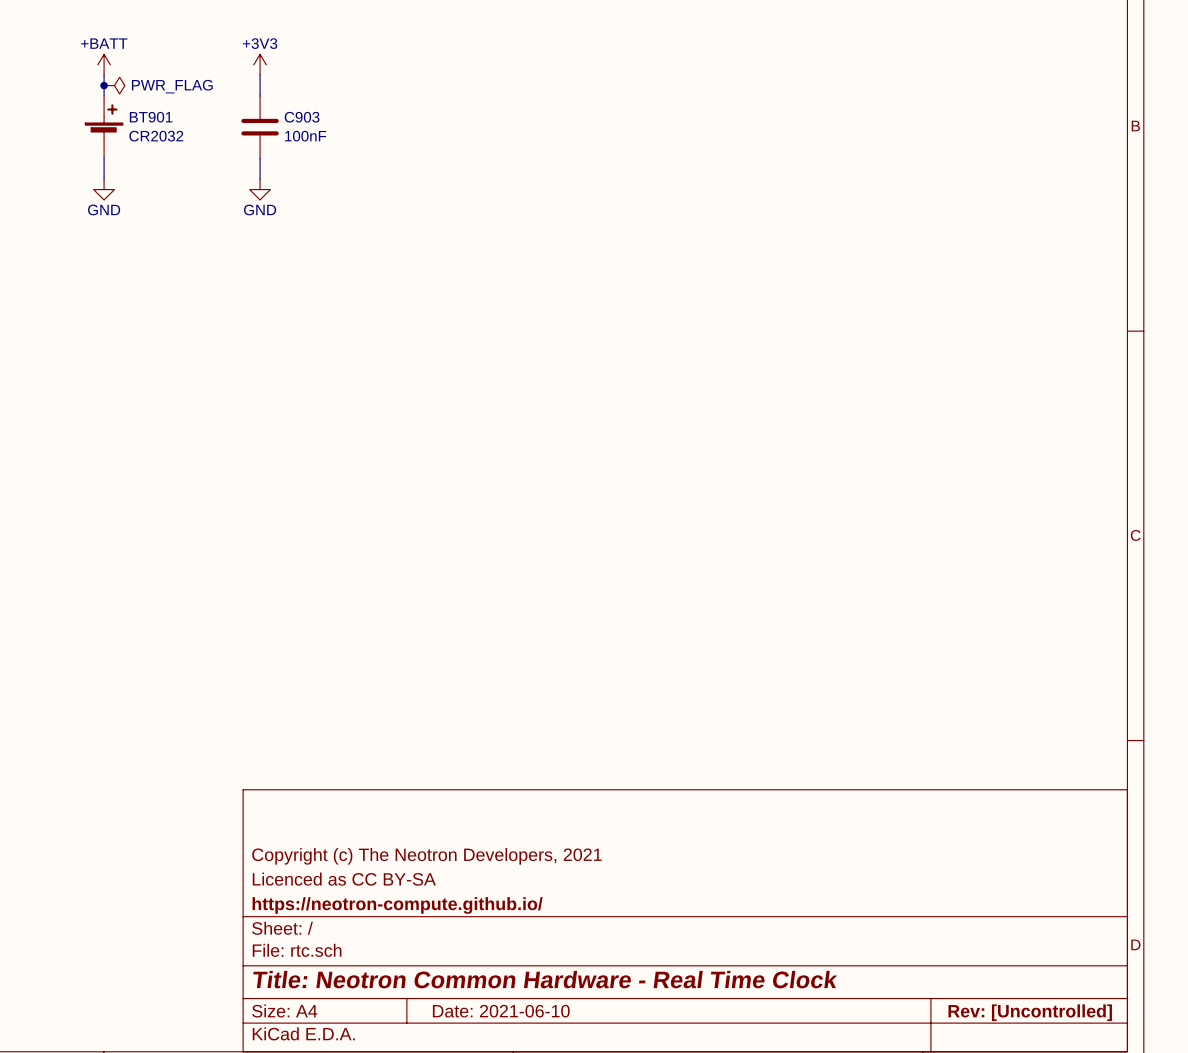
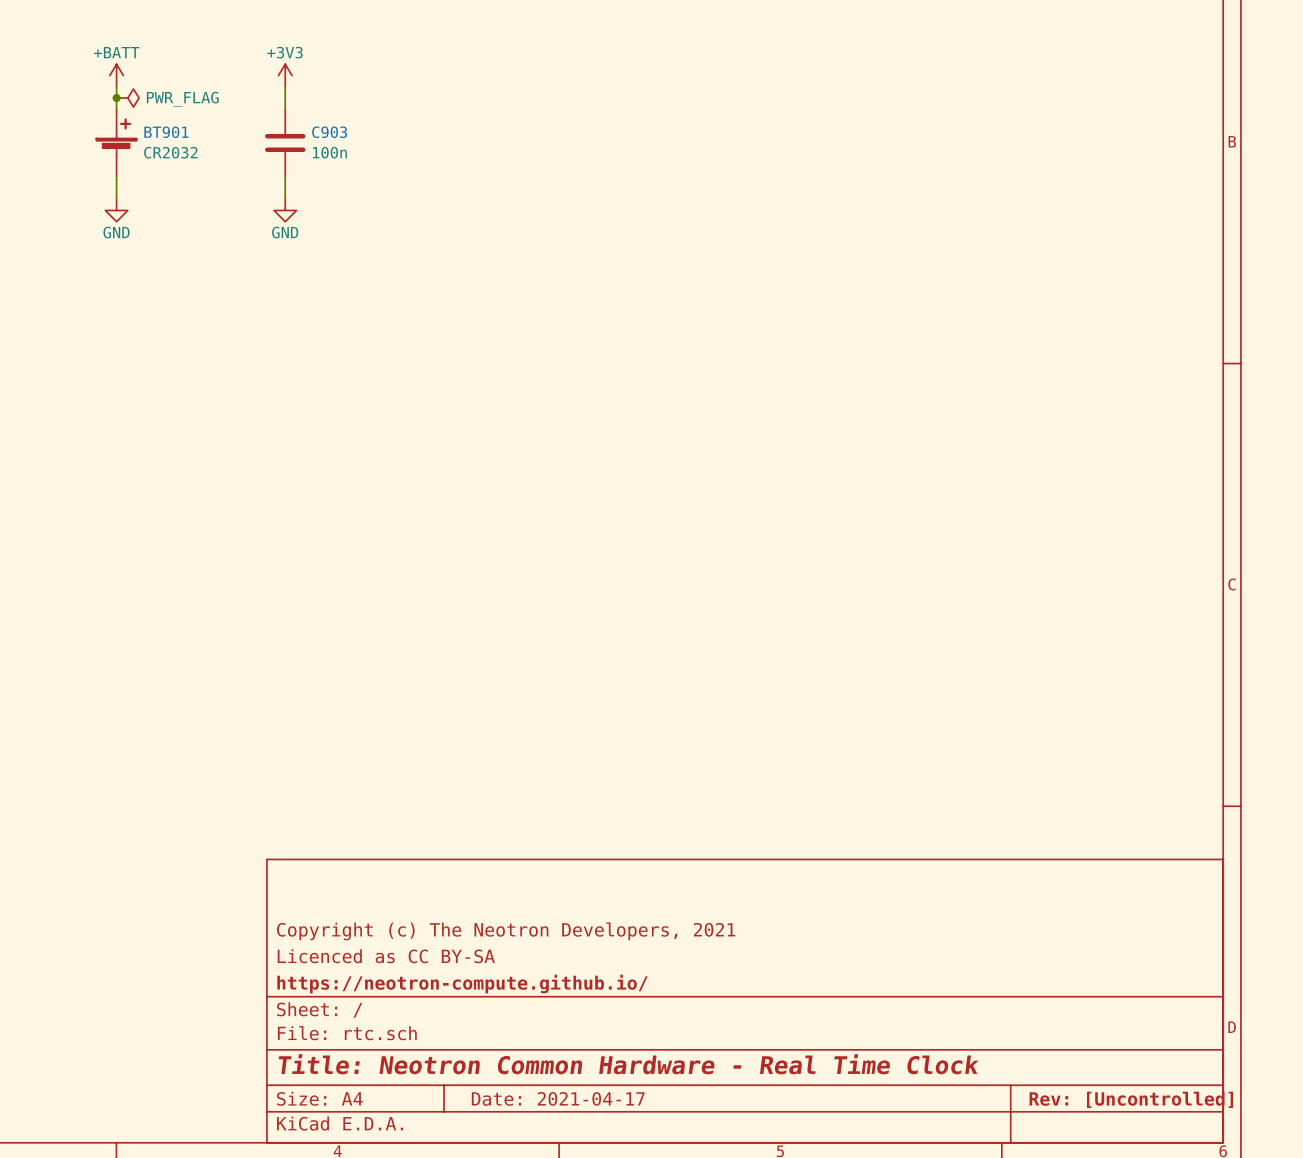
C903 value: 100nF (305, 136) -> 100n (329, 152)
title block: Date: 2021-06-10 (501, 1011) -> Date: 2021-04-17 (558, 1098)

